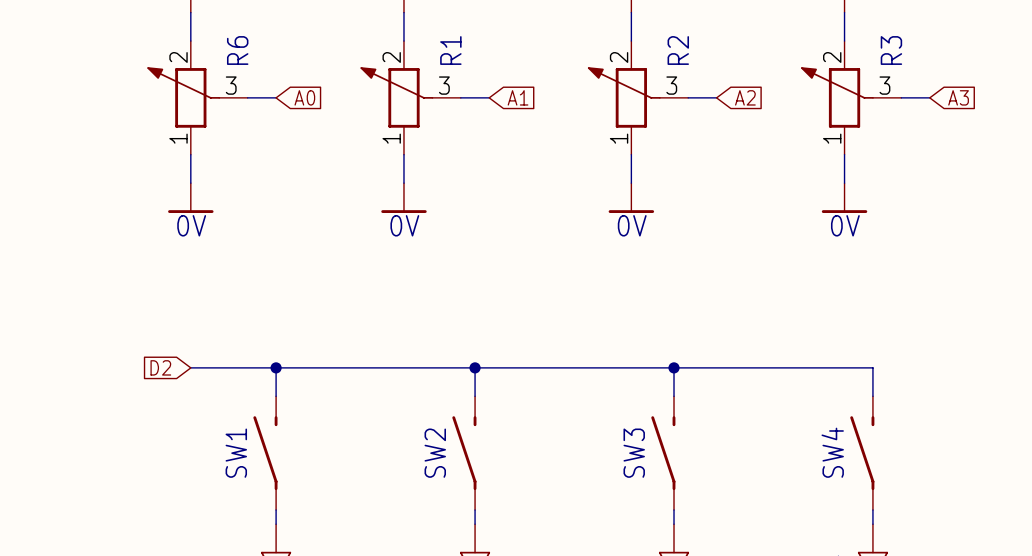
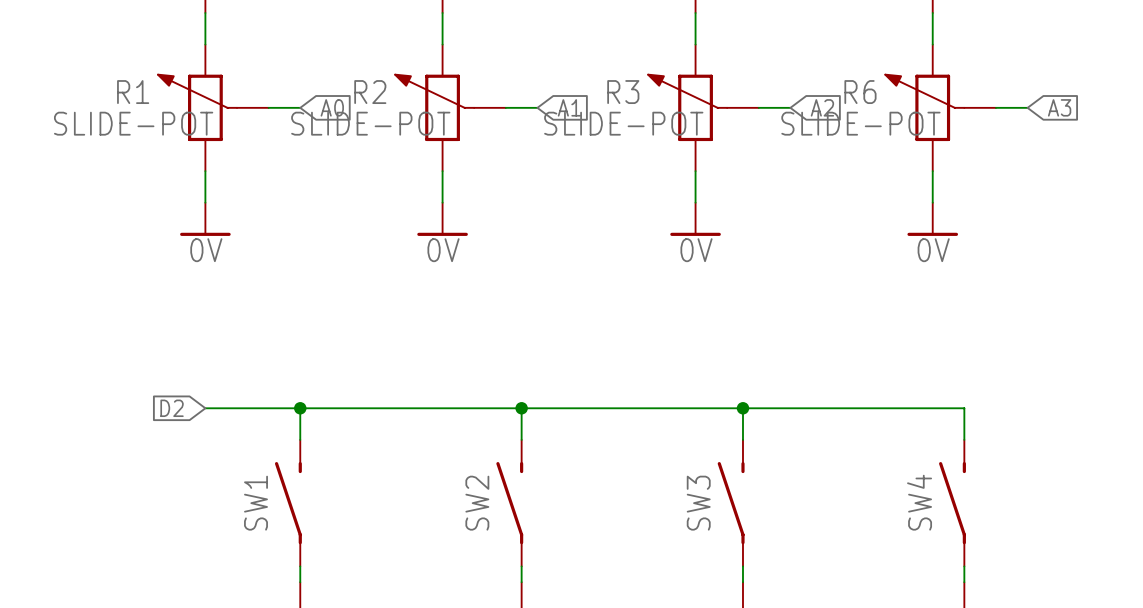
R6 name rotation: 0° (237, 50) -> 90° clockwise (860, 92)
R6 name position: R6 (237, 50) -> R6 (860, 92)
R1 name rotation: 0° (450, 50) -> 90° clockwise (133, 92)
R1 name position: R1 (450, 50) -> R1 (133, 92)
R2 name rotation: 0° (678, 50) -> 90° clockwise (370, 92)
R2 name position: R2 (678, 50) -> R2 (370, 92)
R3 name rotation: 0° (891, 50) -> 90° clockwise (623, 92)
R3 name position: R3 (891, 50) -> R3 (623, 92)
R6 pin number: 2 (178, 57) -> none
R1 pin number: 2 (391, 57) -> none
R2 pin number: 2 (619, 57) -> none
R3 pin number: 2 (832, 57) -> none
R6 pin number: 3 (231, 85) -> none
R1 pin number: 3 (444, 85) -> none
R2 pin number: 3 (671, 85) -> none
R3 pin number: 3 (884, 85) -> none
R6 position: (197, 97) -> (940, 107)
R1 position: (410, 97) -> (212, 107)
R2 position: (638, 97) -> (450, 107)
R3 position: (851, 97) -> (702, 107)
R1 value: none -> SLIDE-POT (133, 123)
R2 value: none -> SLIDE-POT (370, 123)
R3 value: none -> SLIDE-POT (623, 123)
R6 value: none -> SLIDE-POT (860, 123)
R6 pin number: 1 (178, 138) -> none
R1 pin number: 1 (391, 138) -> none
R2 pin number: 1 (619, 138) -> none
R3 pin number: 1 (832, 138) -> none

